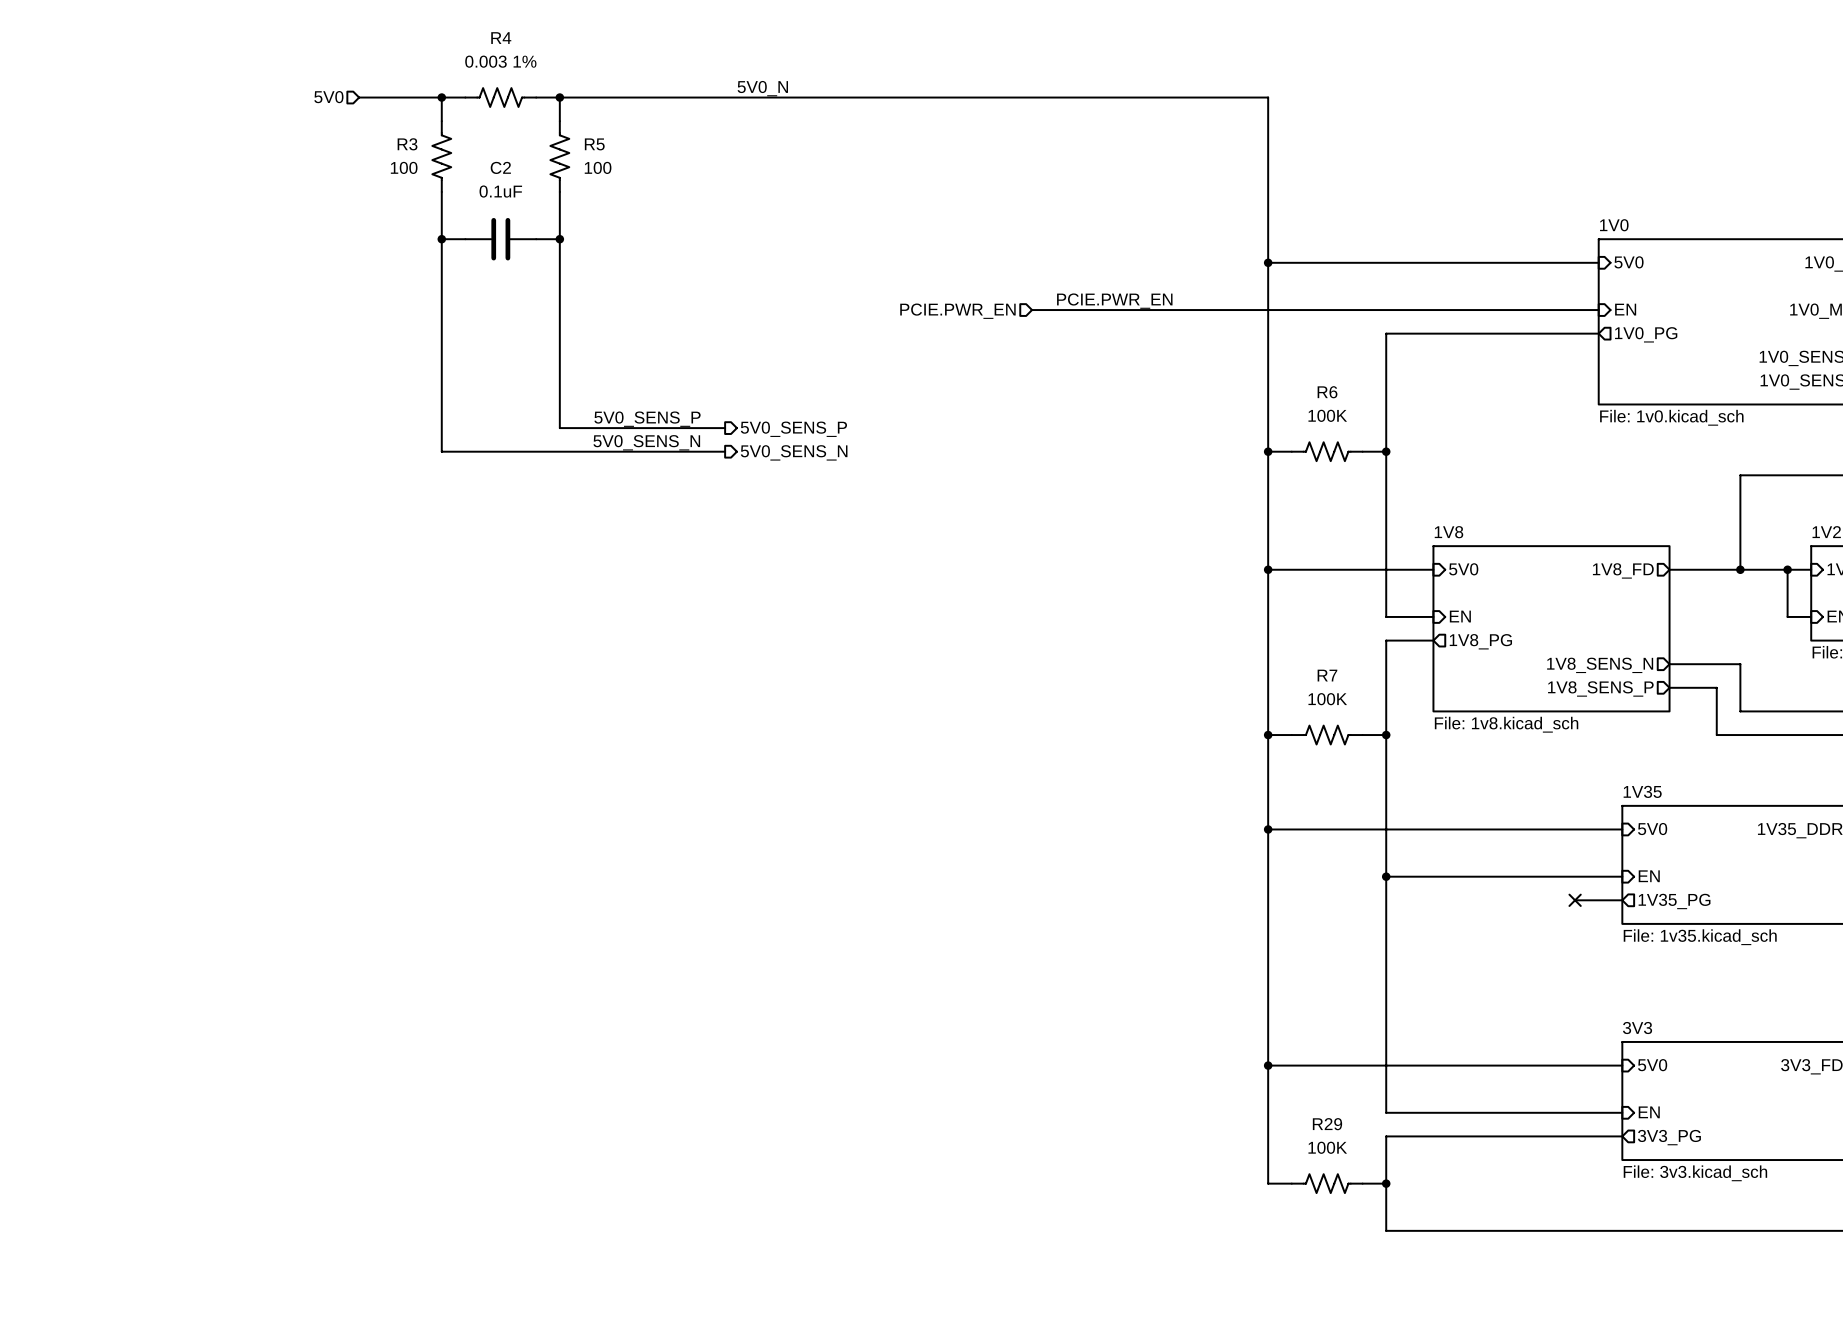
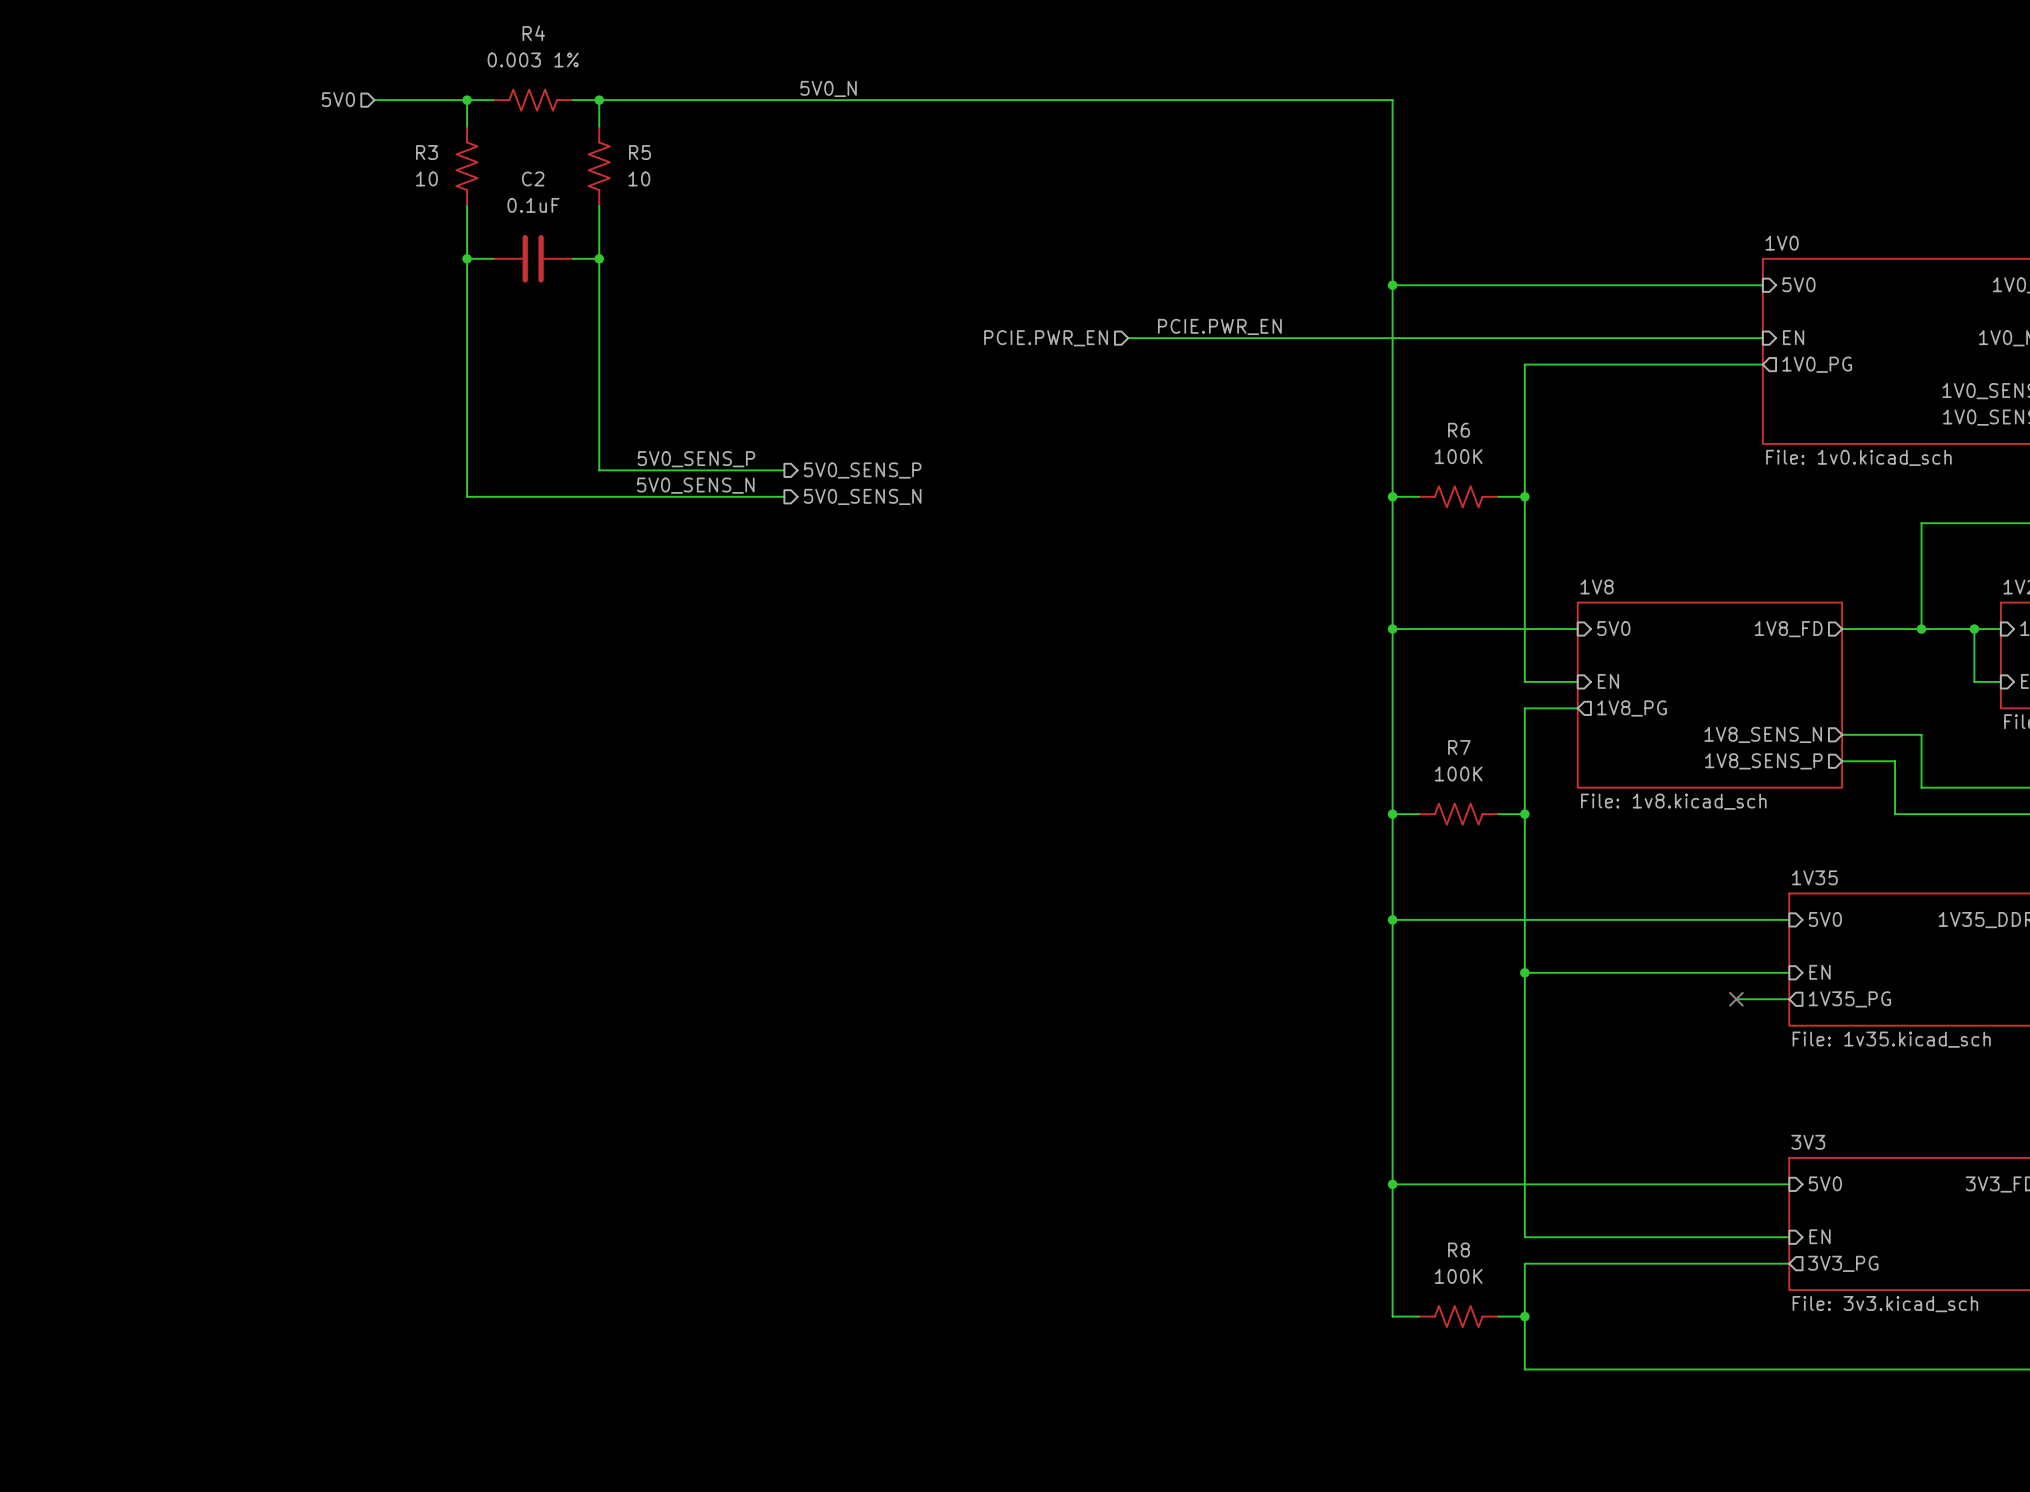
R3 value: 100 (404, 167) -> 10 (426, 178)
R5 value: 100 (598, 167) -> 10 (639, 178)
R29 name: R29 (1327, 1124) -> R8 (1459, 1249)

